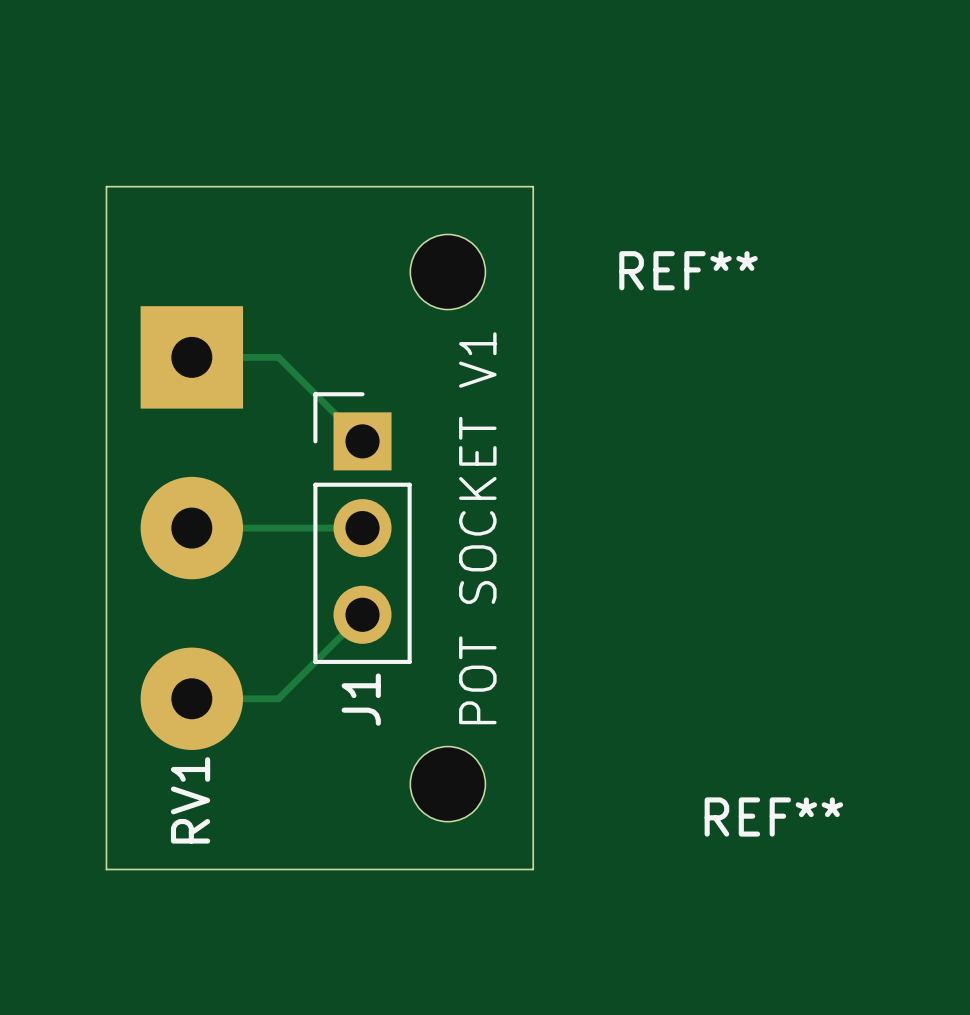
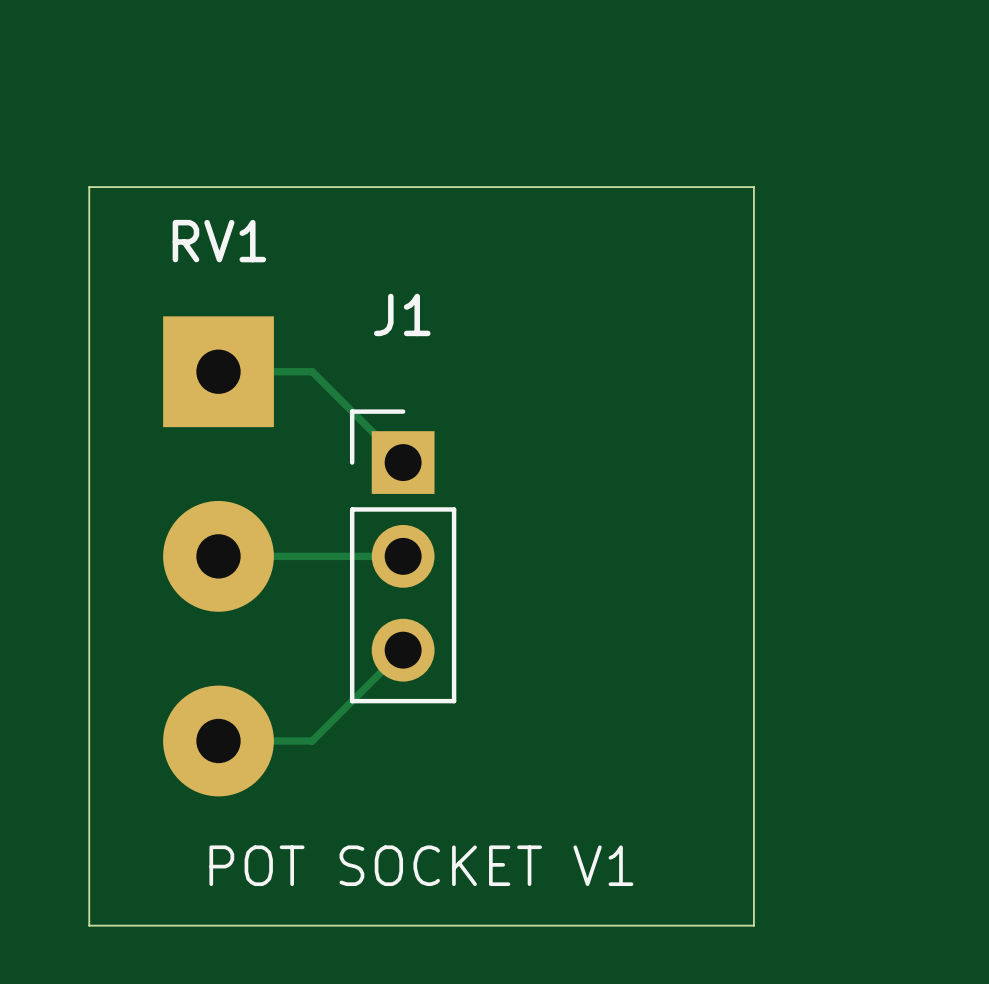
board edge: (106, 186) (106, 869) -> (126, 187) (89, 187) (89, 925) (126, 925)
board edge: (533, 186) (533, 869) -> (587, 187) (753, 187) (753, 925) (587, 925)
REF**: (447, 272) -> none
text rotation: 0° (477, 528) -> 90° clockwise (421, 865)
J1 name rotation: 0° (361, 699) -> 90° clockwise (402, 314)
J1 name position: J1 (361, 699) -> J1 (402, 314)
REF**: (447, 784) -> none
RV1 name rotation: 0° (190, 800) -> 90° clockwise (219, 241)
RV1 name position: RV1 (190, 800) -> RV1 (219, 241)

